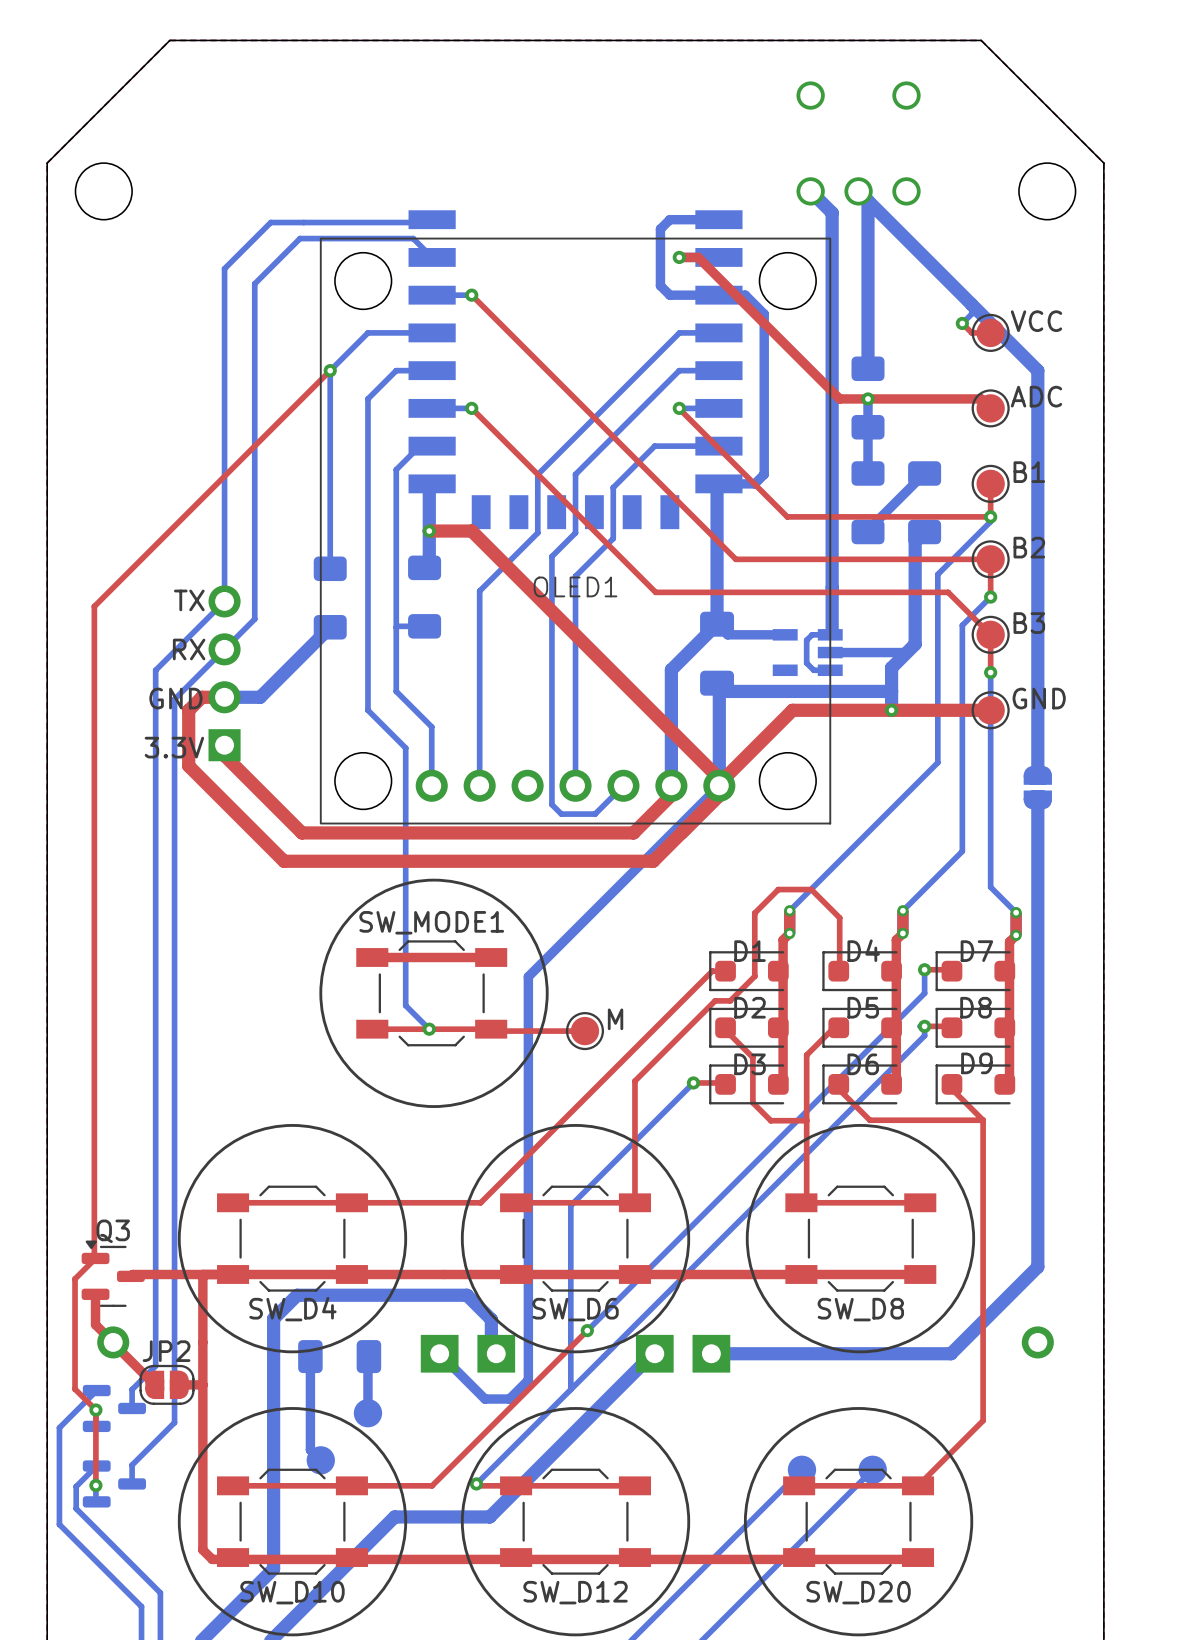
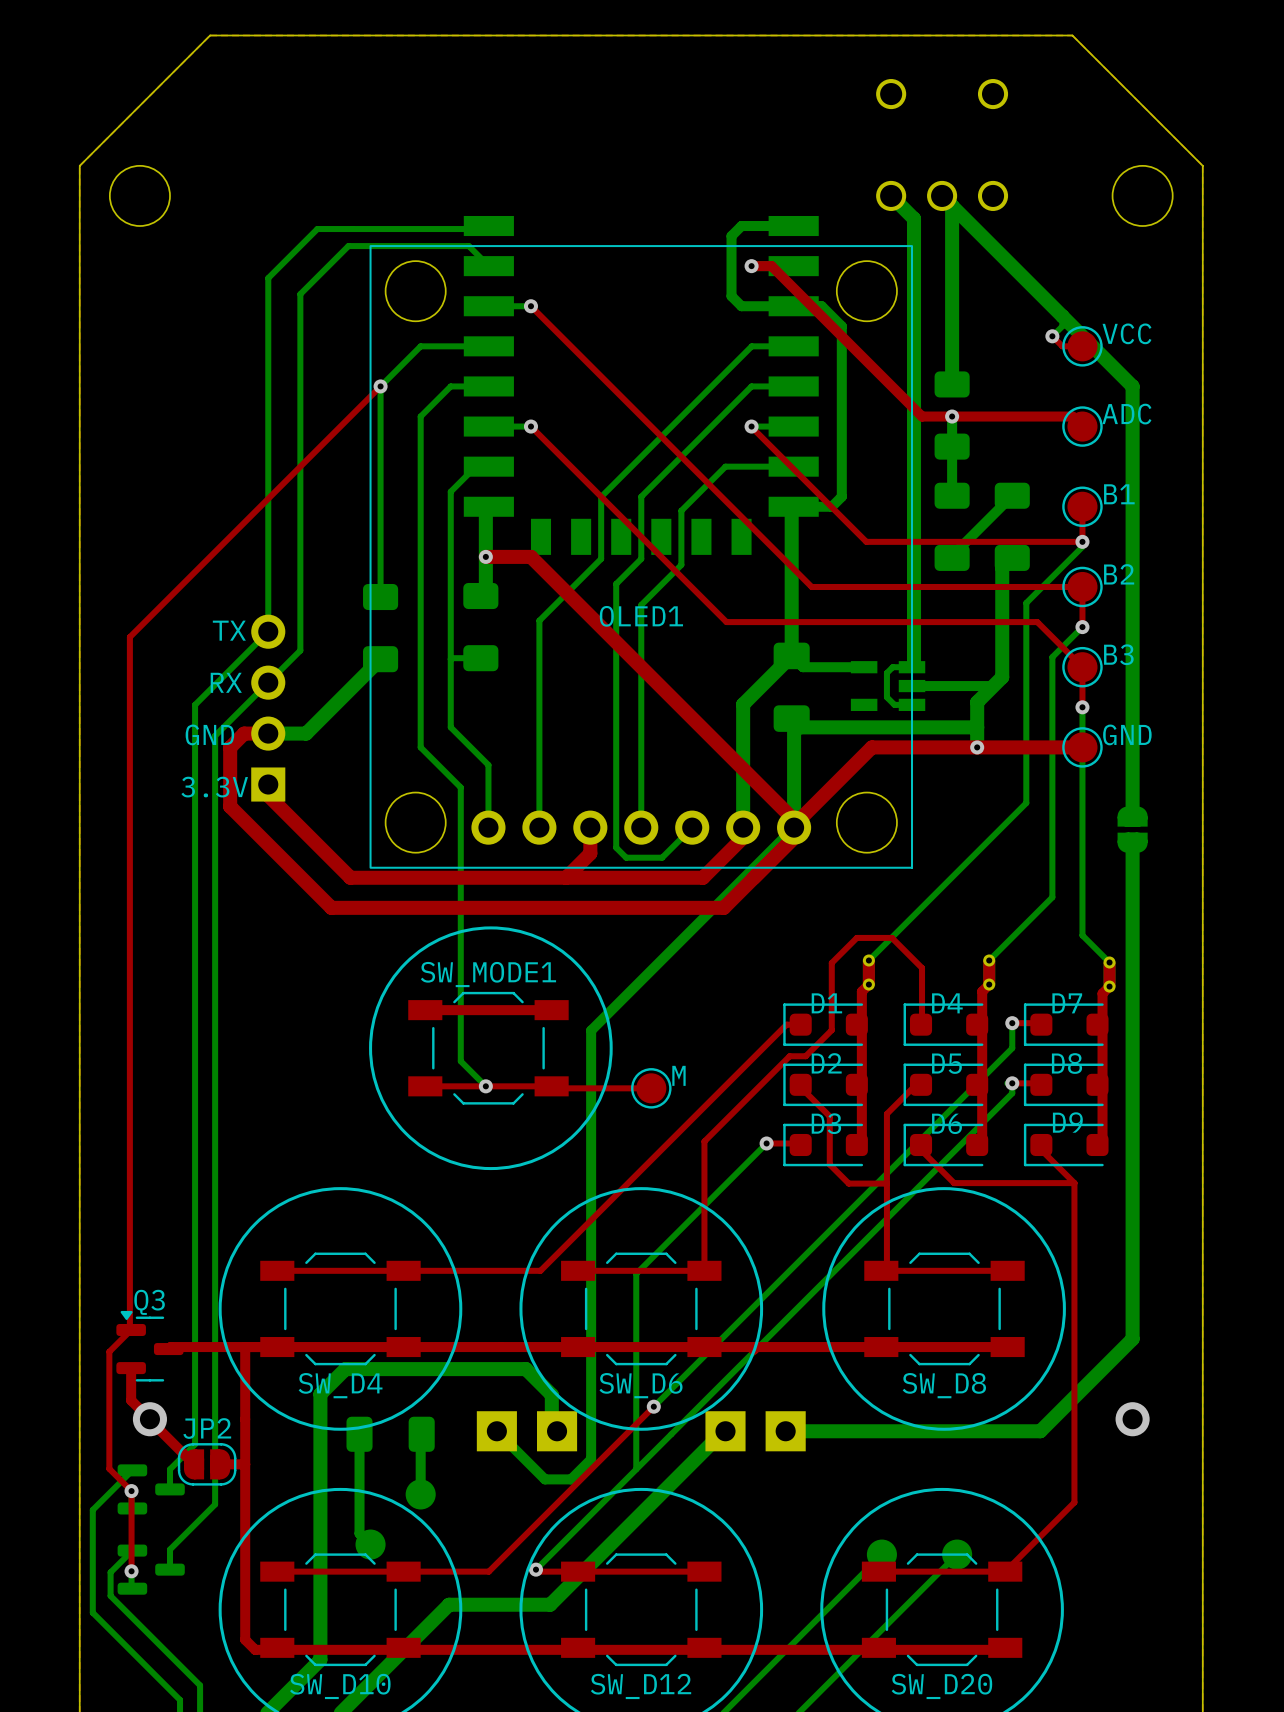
top track: none -> (590, 827) (590, 853) (566, 877)

